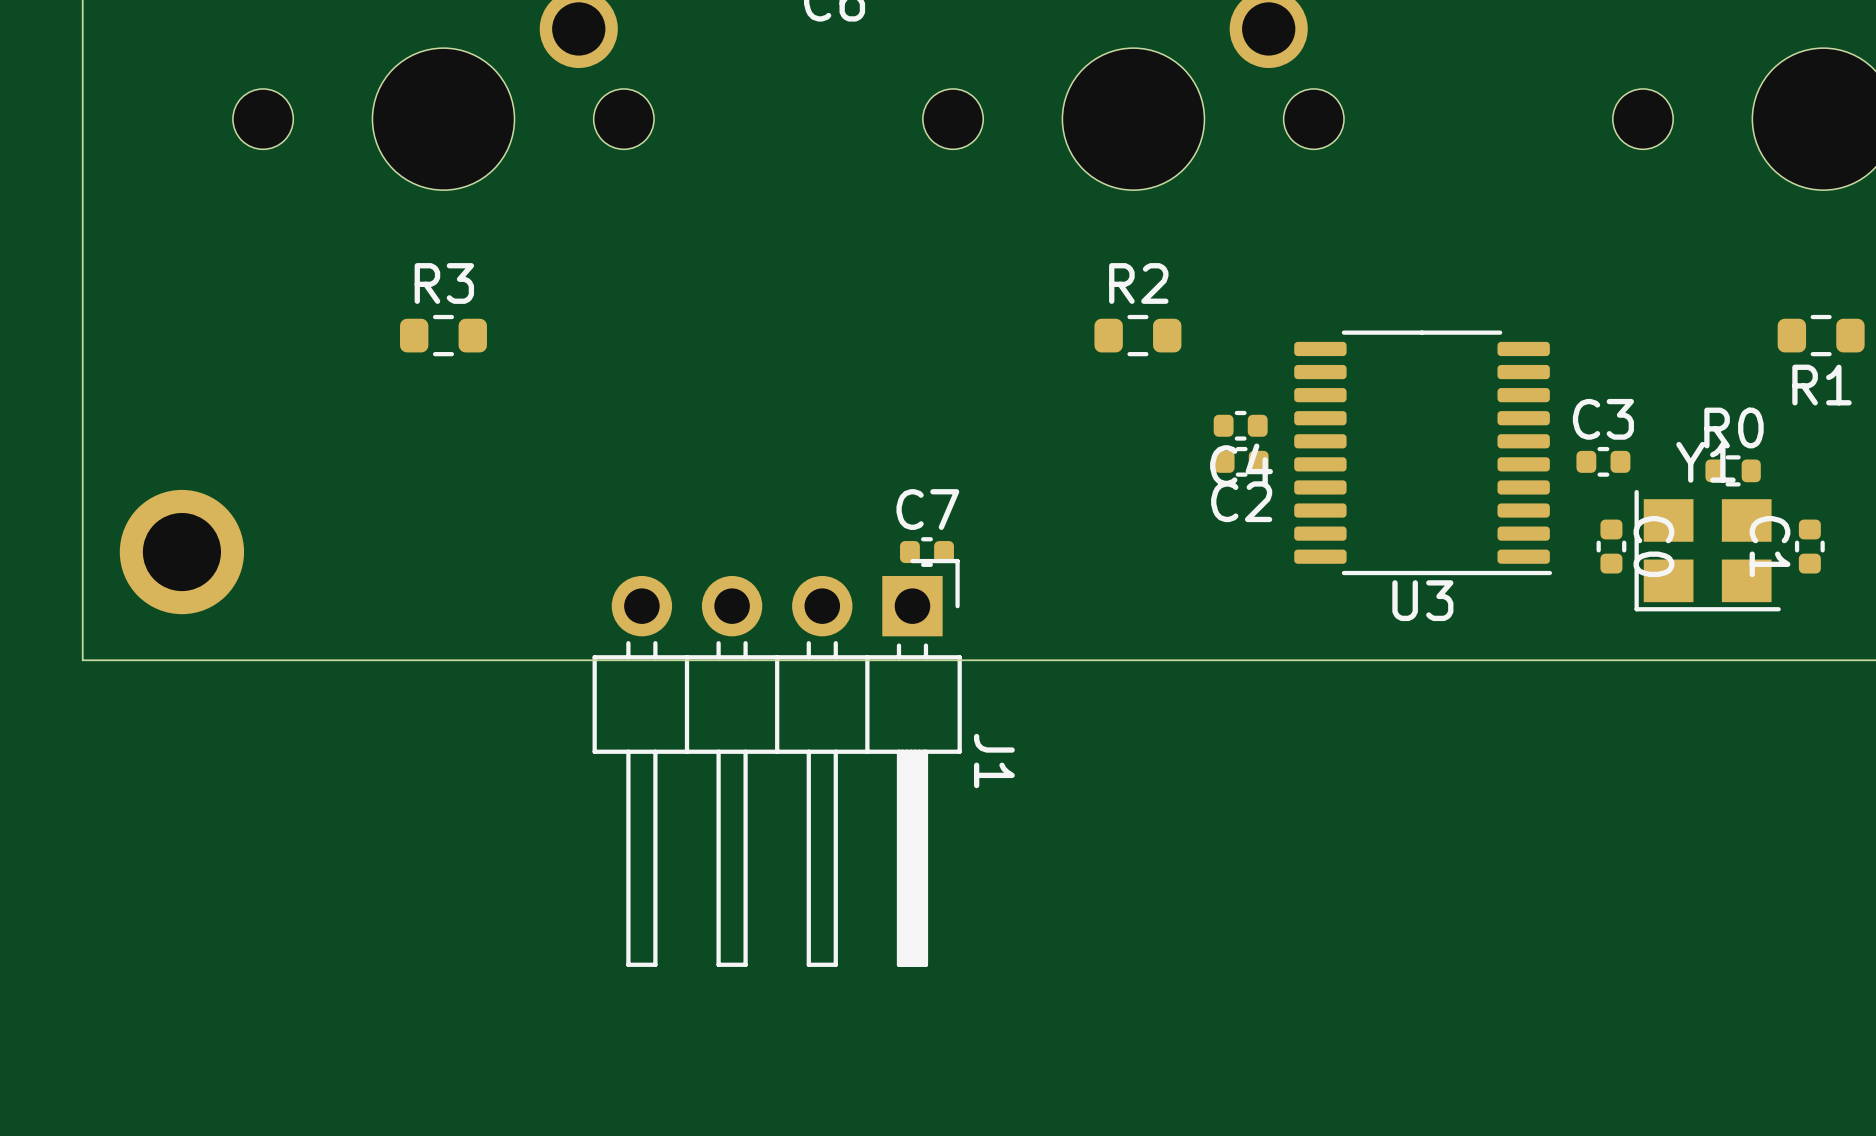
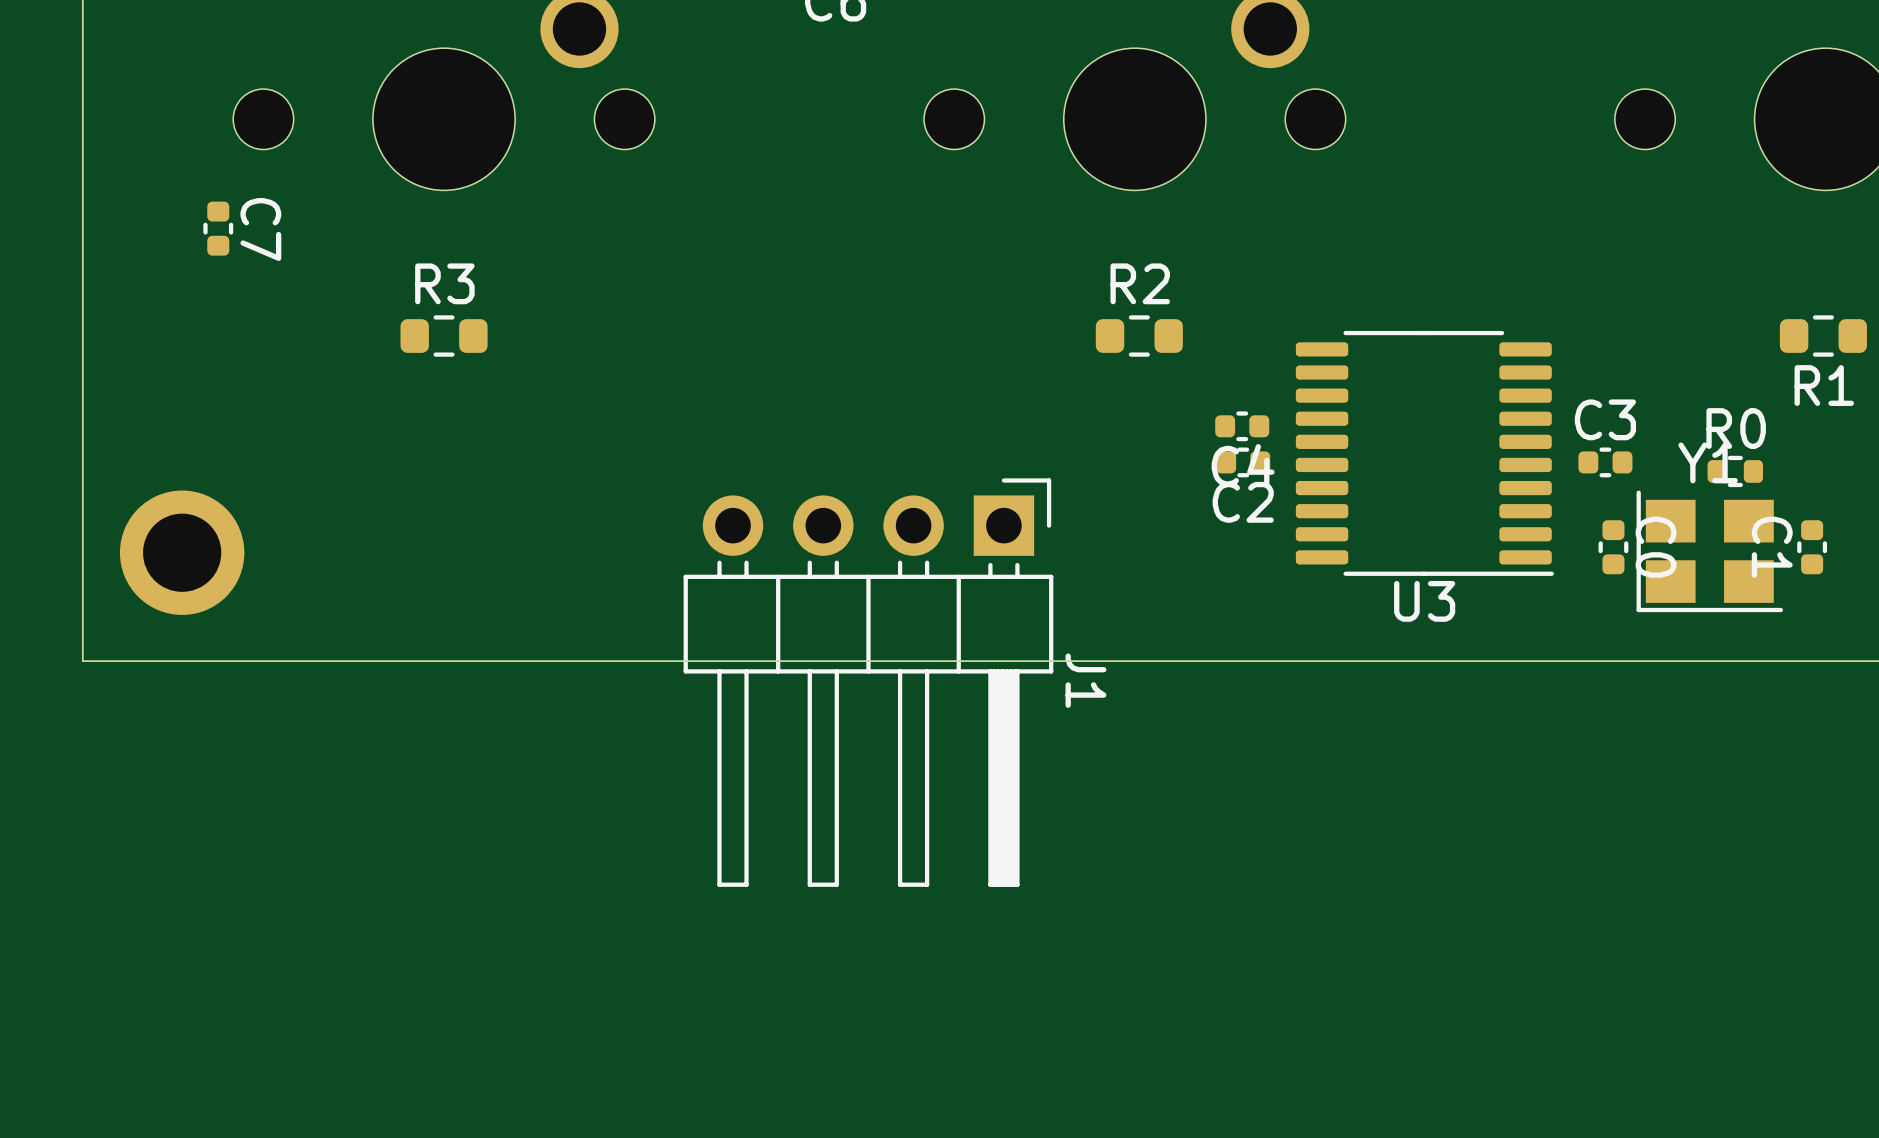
C7 rotation: 0° (926, 552) -> 90° clockwise (218, 228)
C7 position: (926, 552) -> (218, 228)
J1 position: (777, 762) -> (868, 682)

